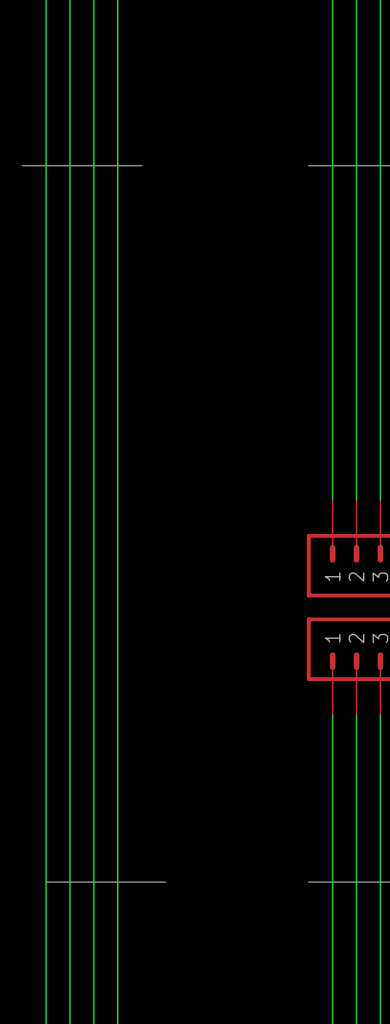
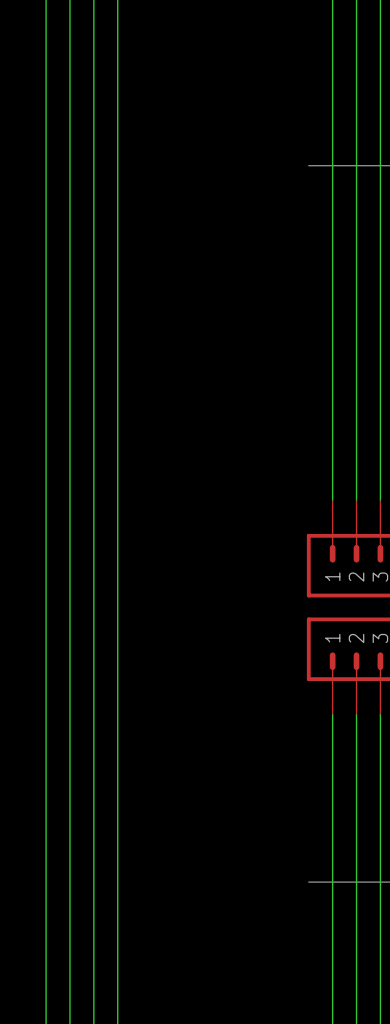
bus: (22, 165) (141, 165) -> none
bus: (46, 882) (165, 882) -> none

